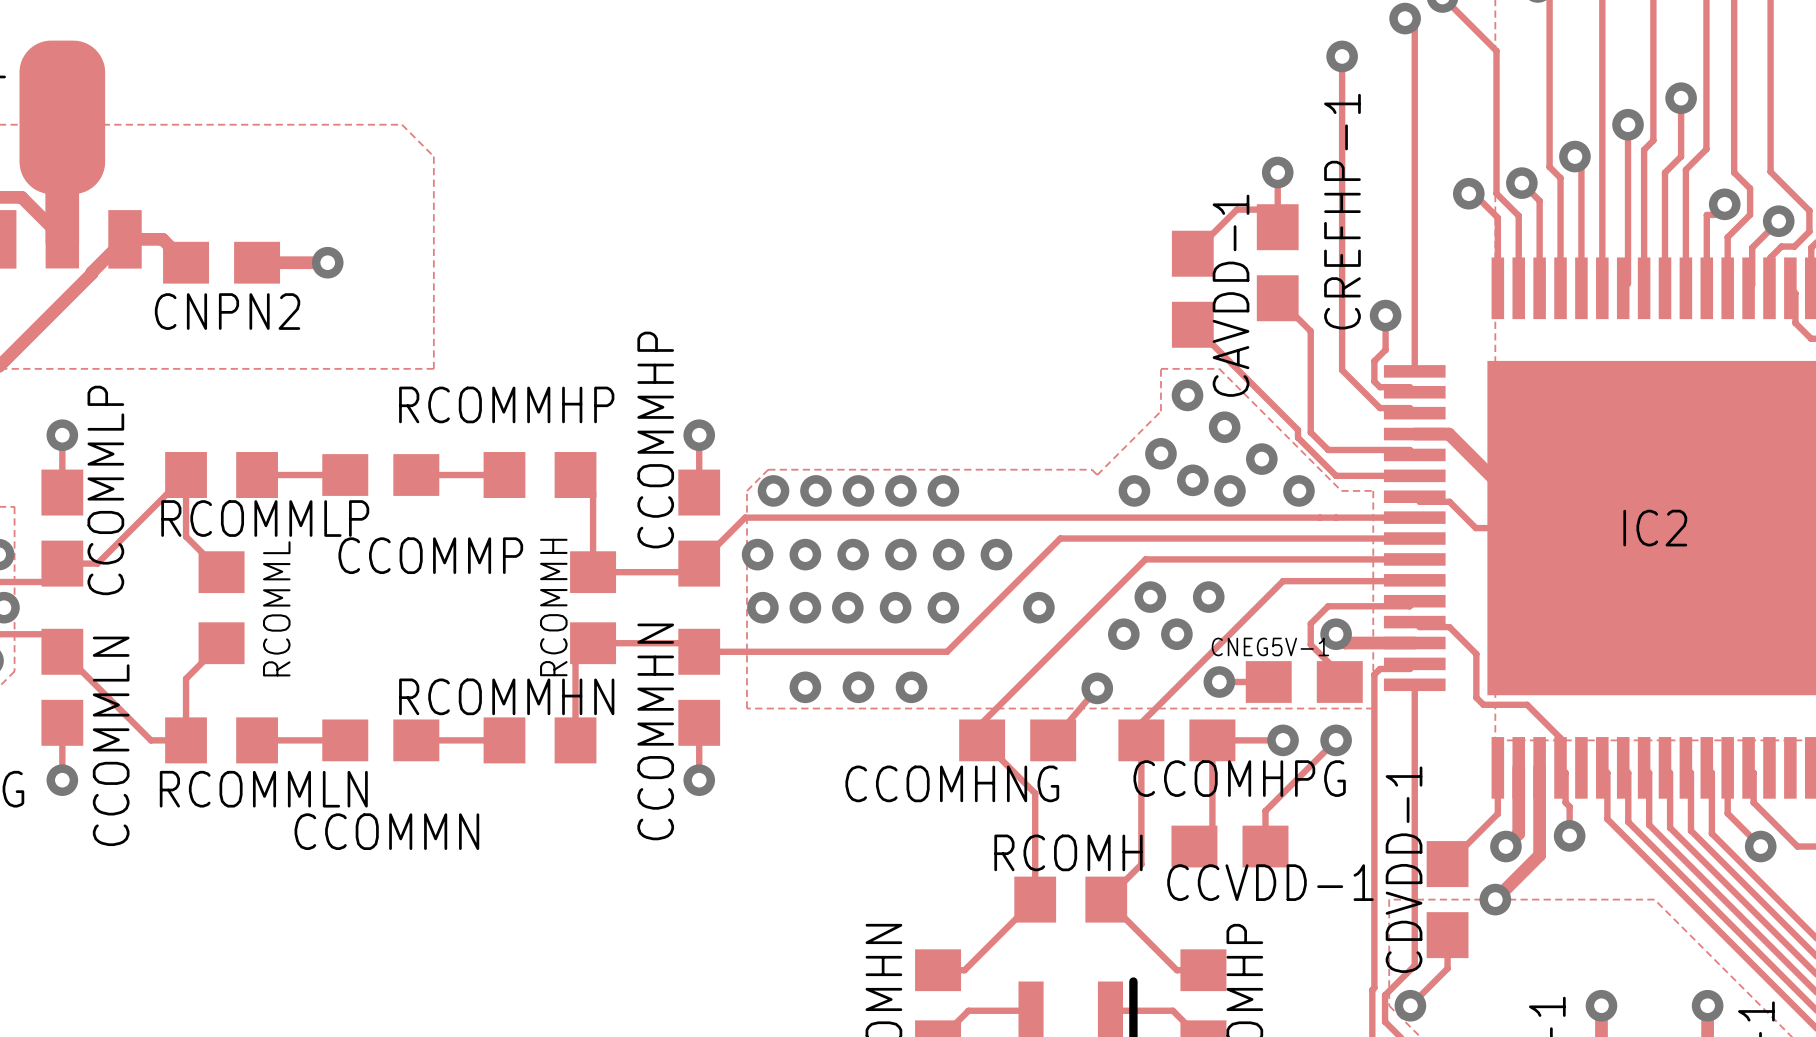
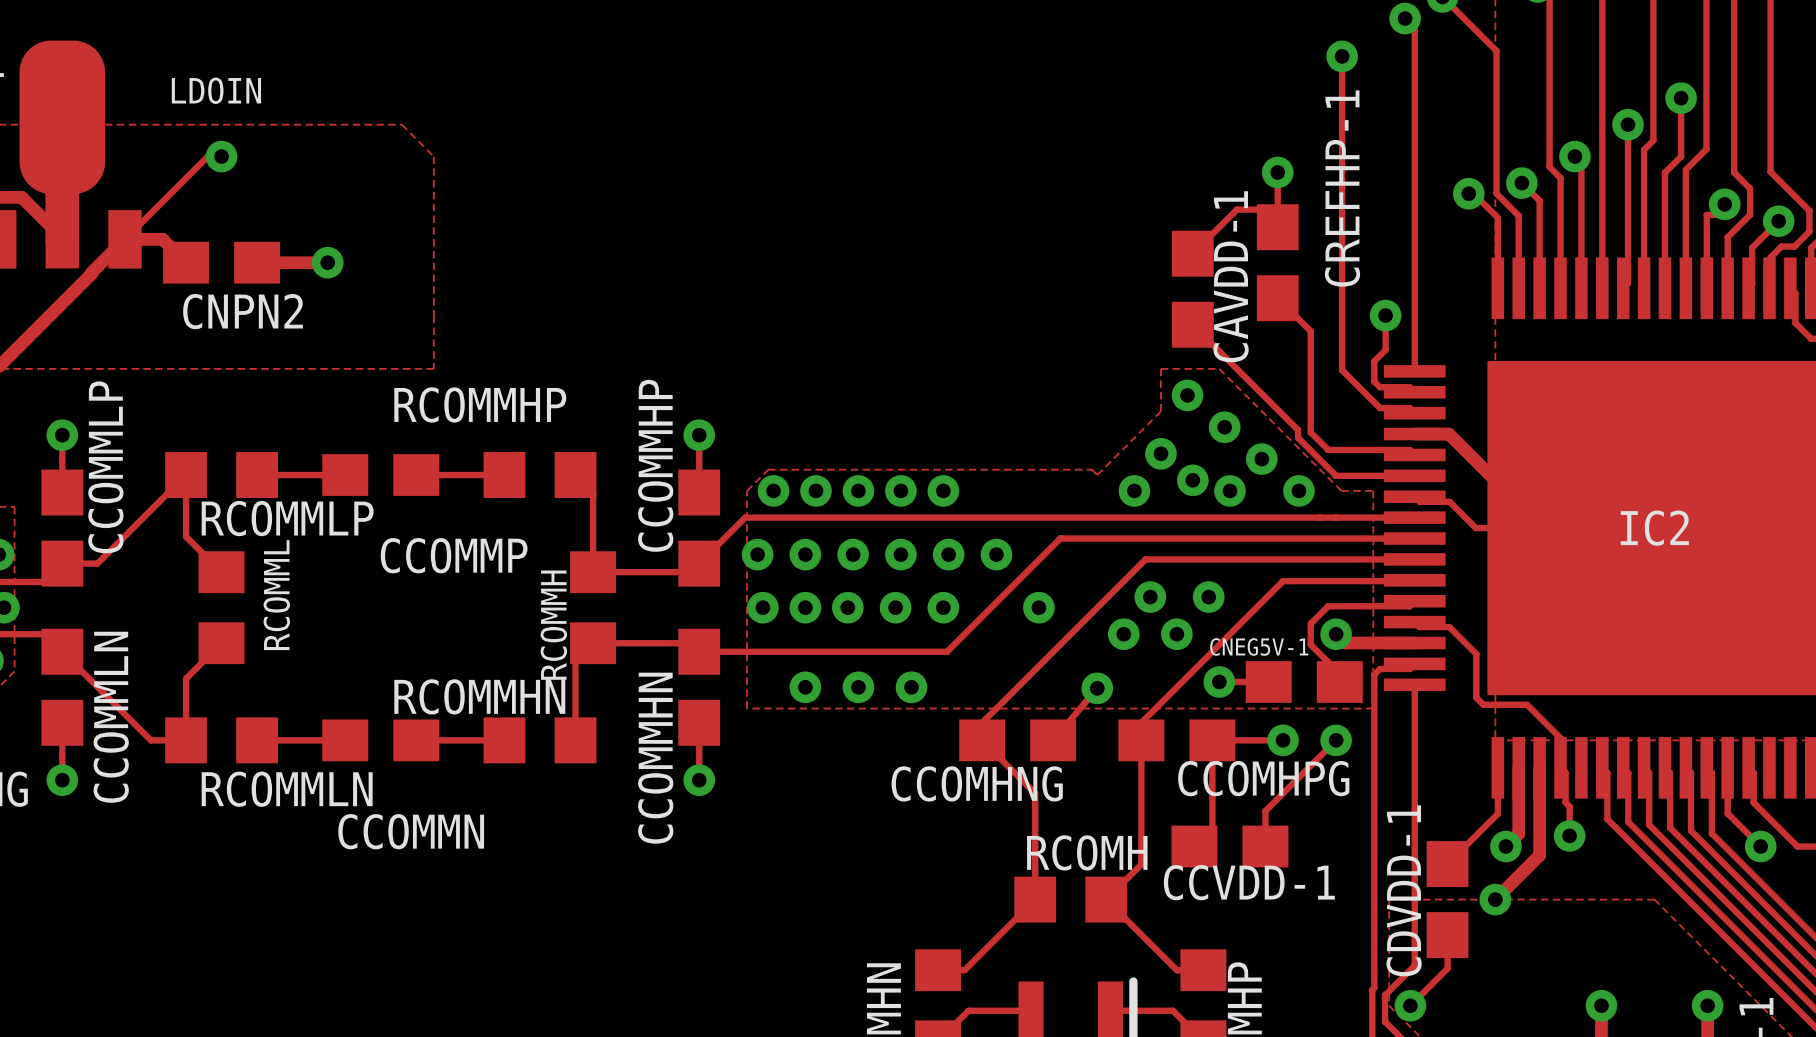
text: none -> LDOIN (216, 90)
track: none -> (221, 156) (207, 156) (124, 239)
via: none -> (221, 156)

